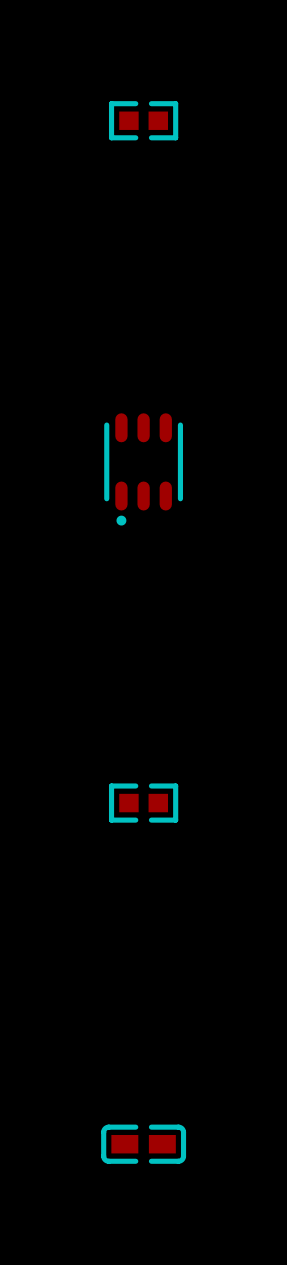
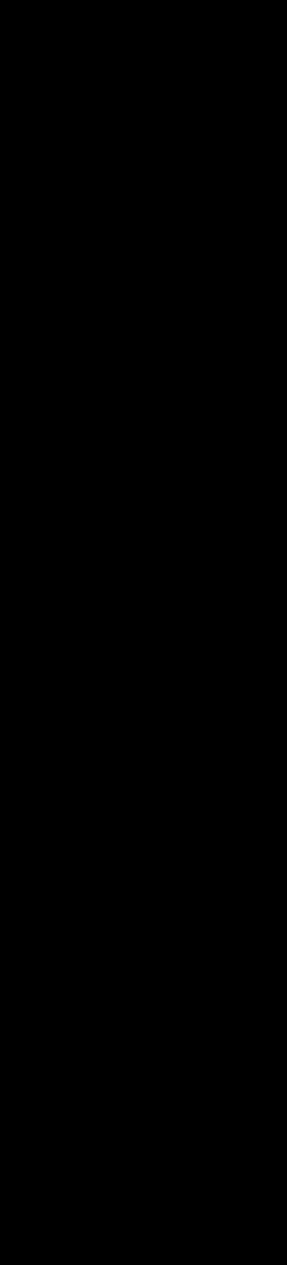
part: (143, 120) -> none
part: (143, 469) -> none
part: (143, 803) -> none
part: (143, 1144) -> none

